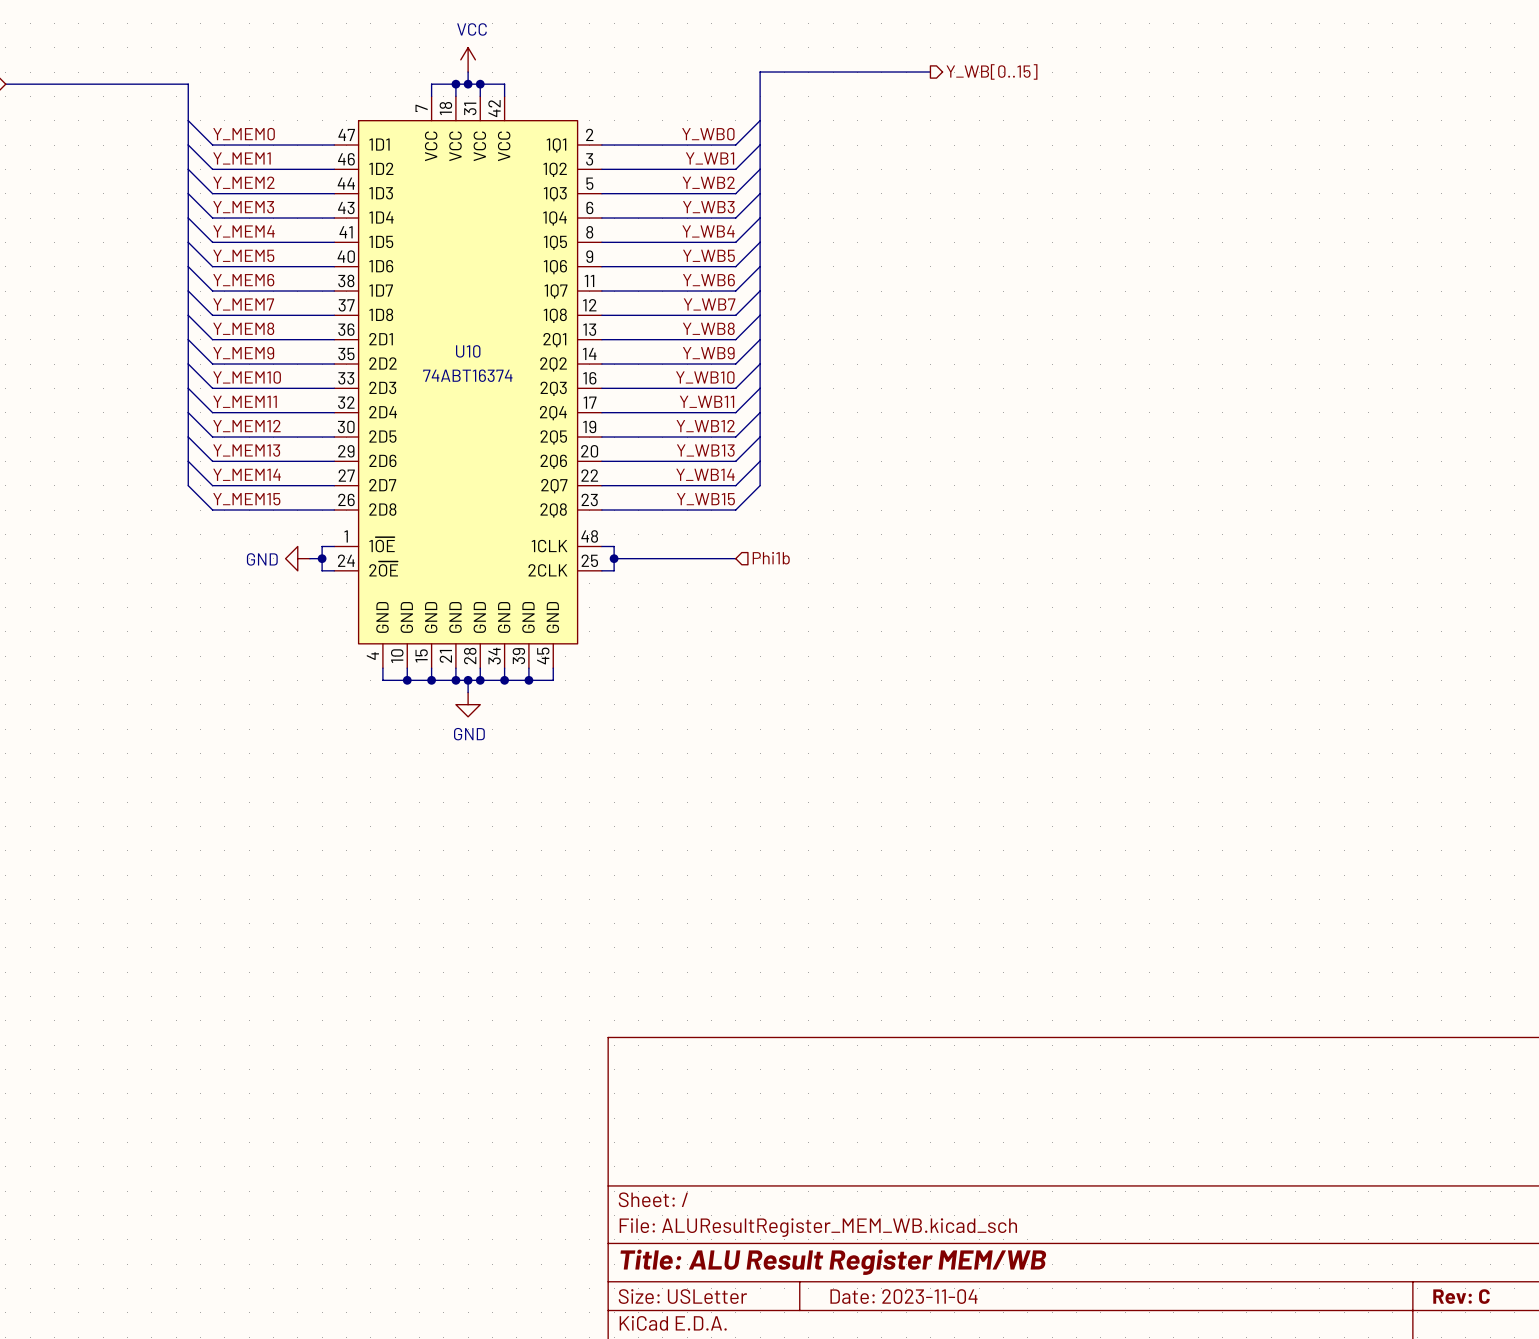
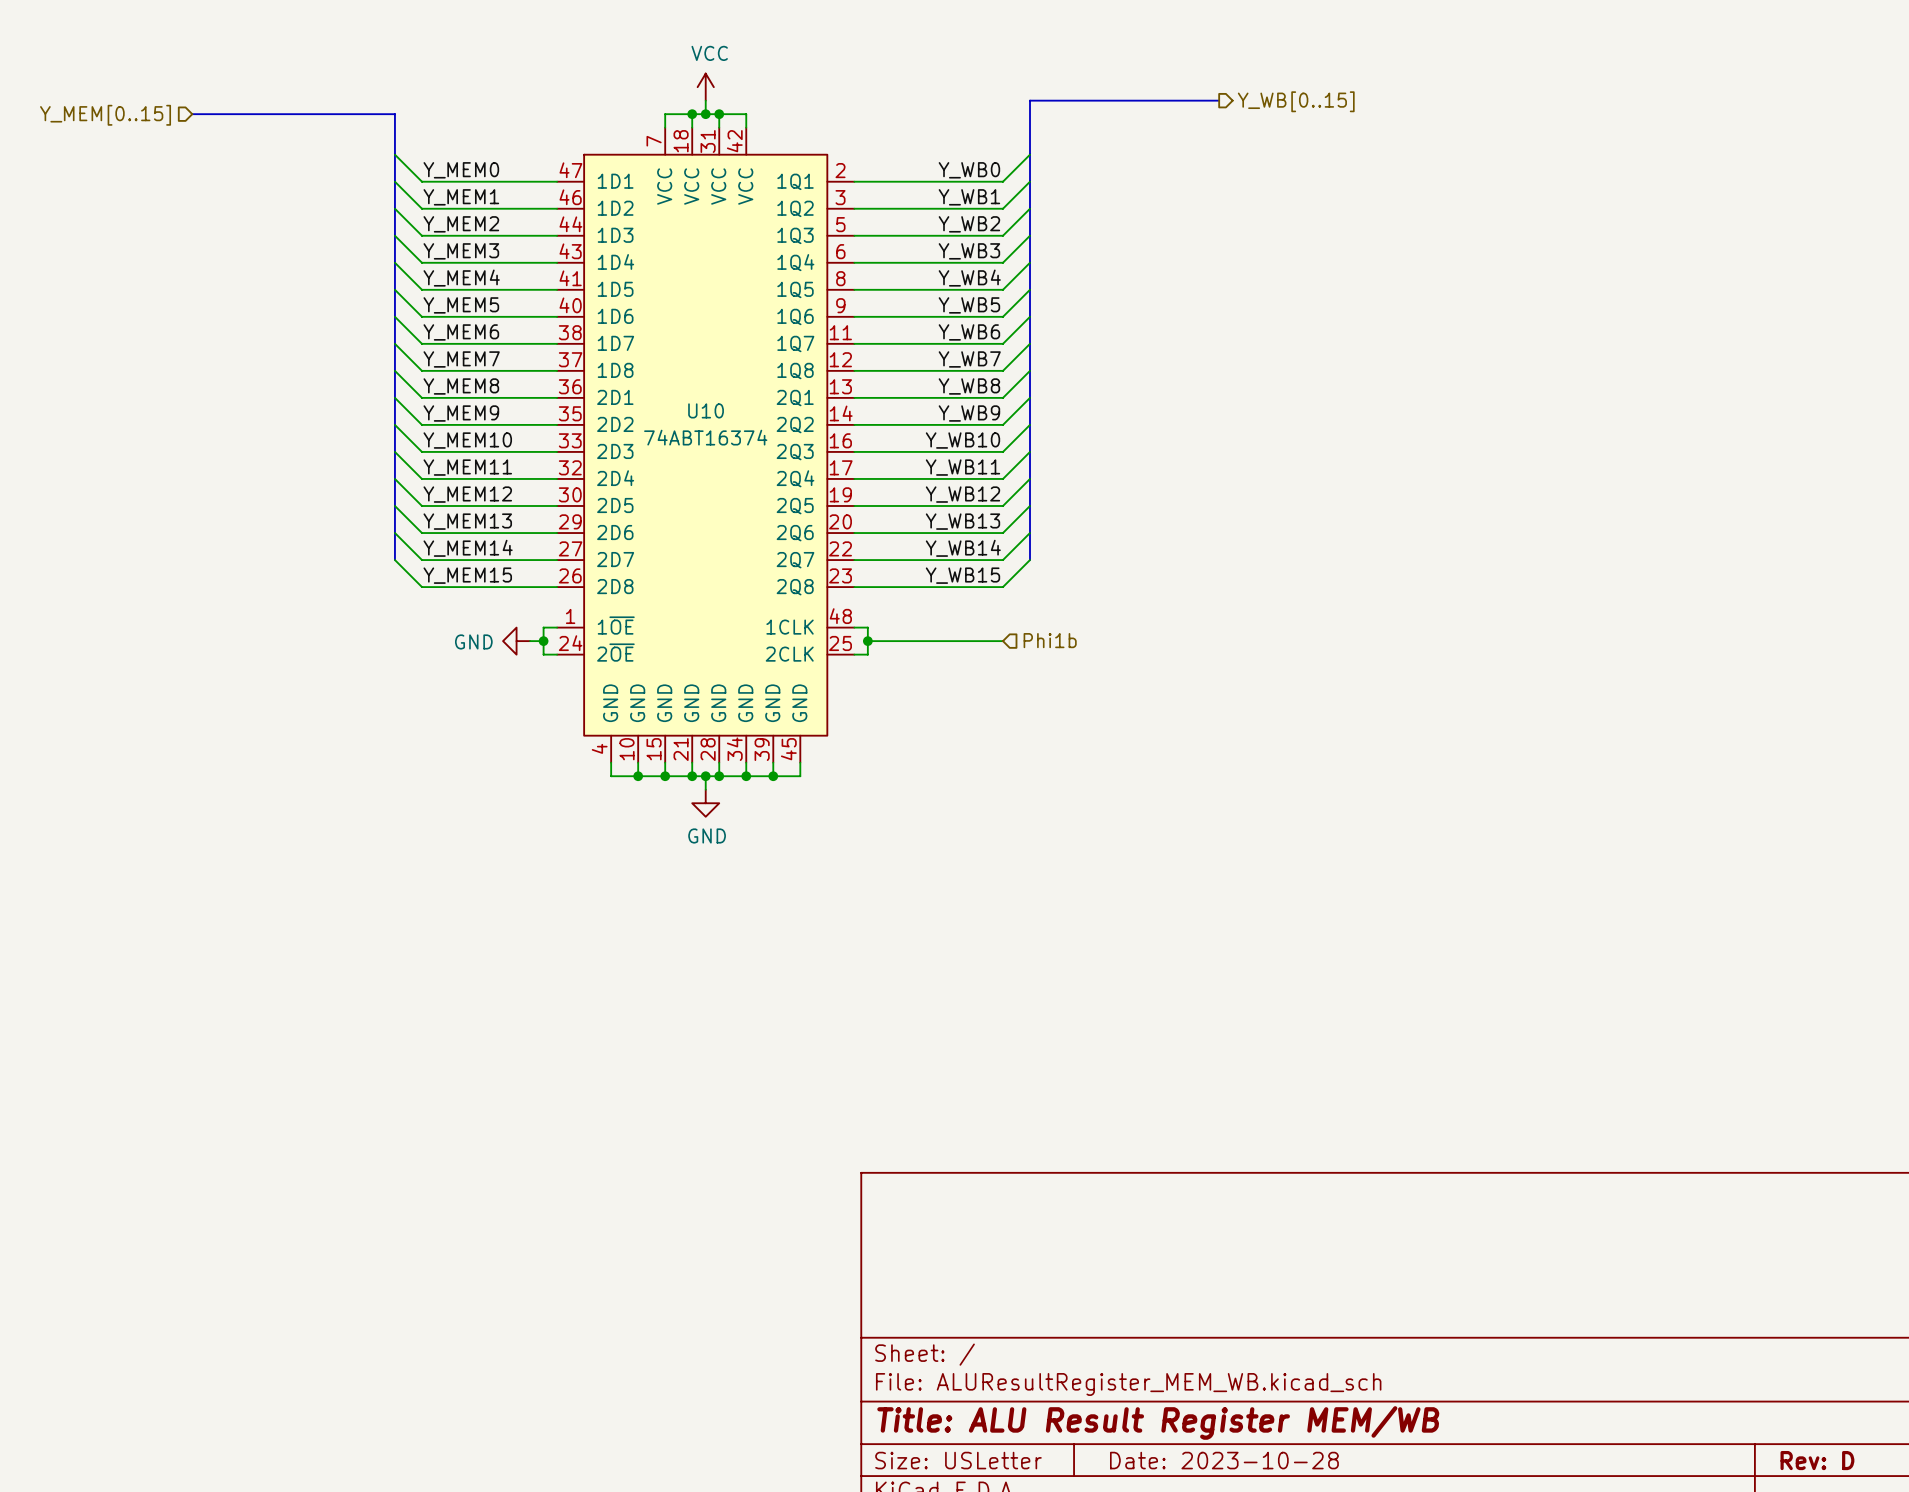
title block: Date: 2023-11-04 (903, 1296) -> Date: 2023-10-28 (1224, 1460)
title block: Rev: C (1461, 1296) -> Rev: D (1817, 1460)

